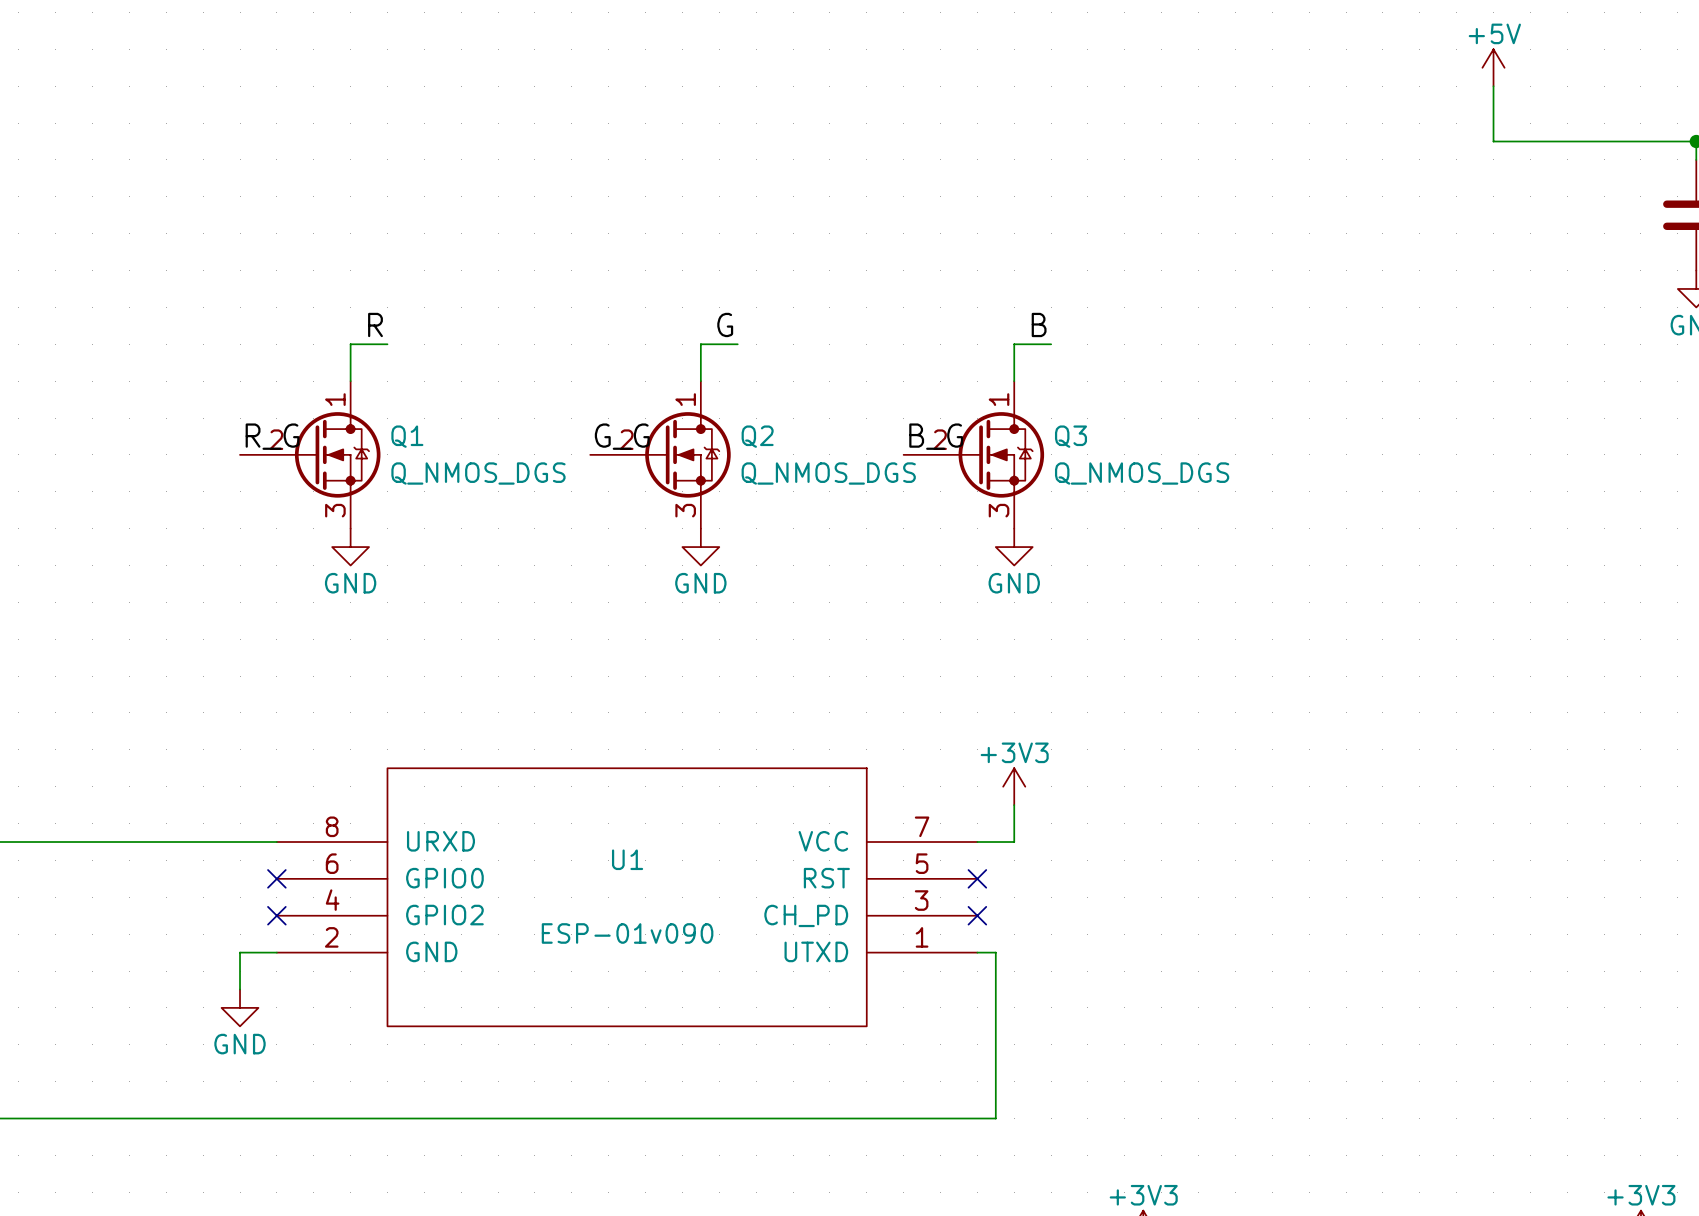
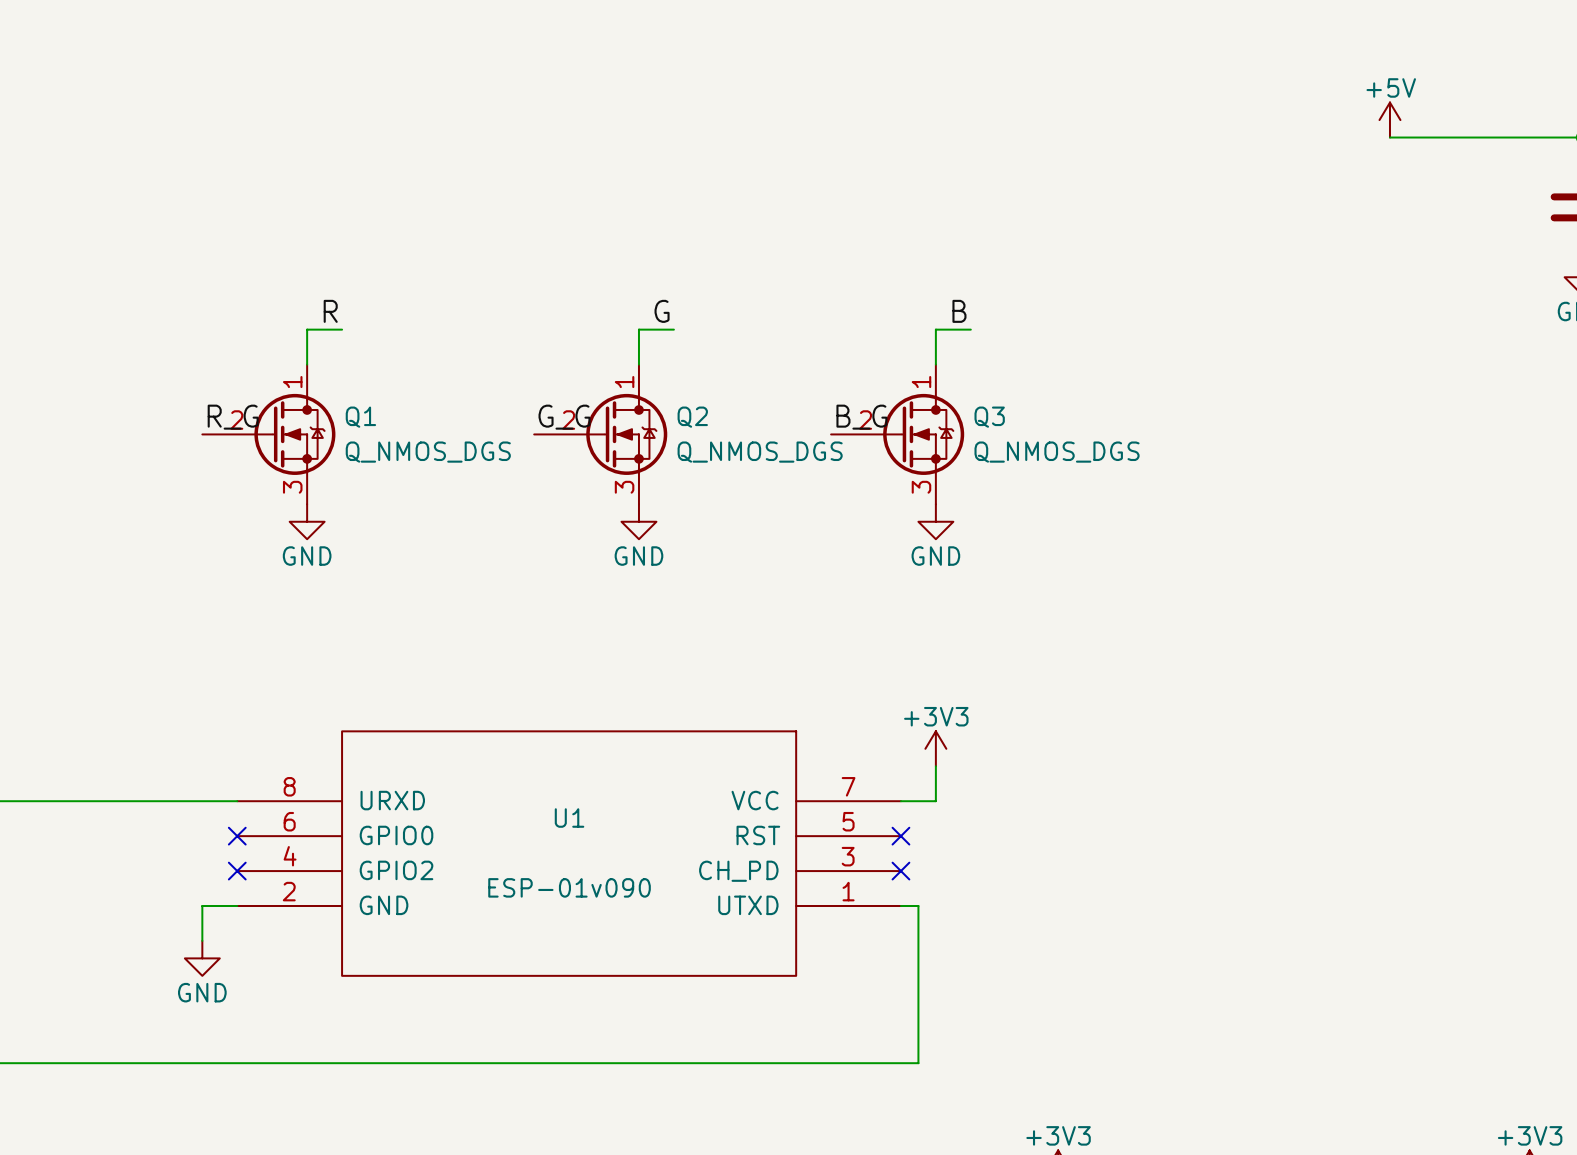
power symbol position: +5V (1493, 67) -> +5V (1389, 120)

